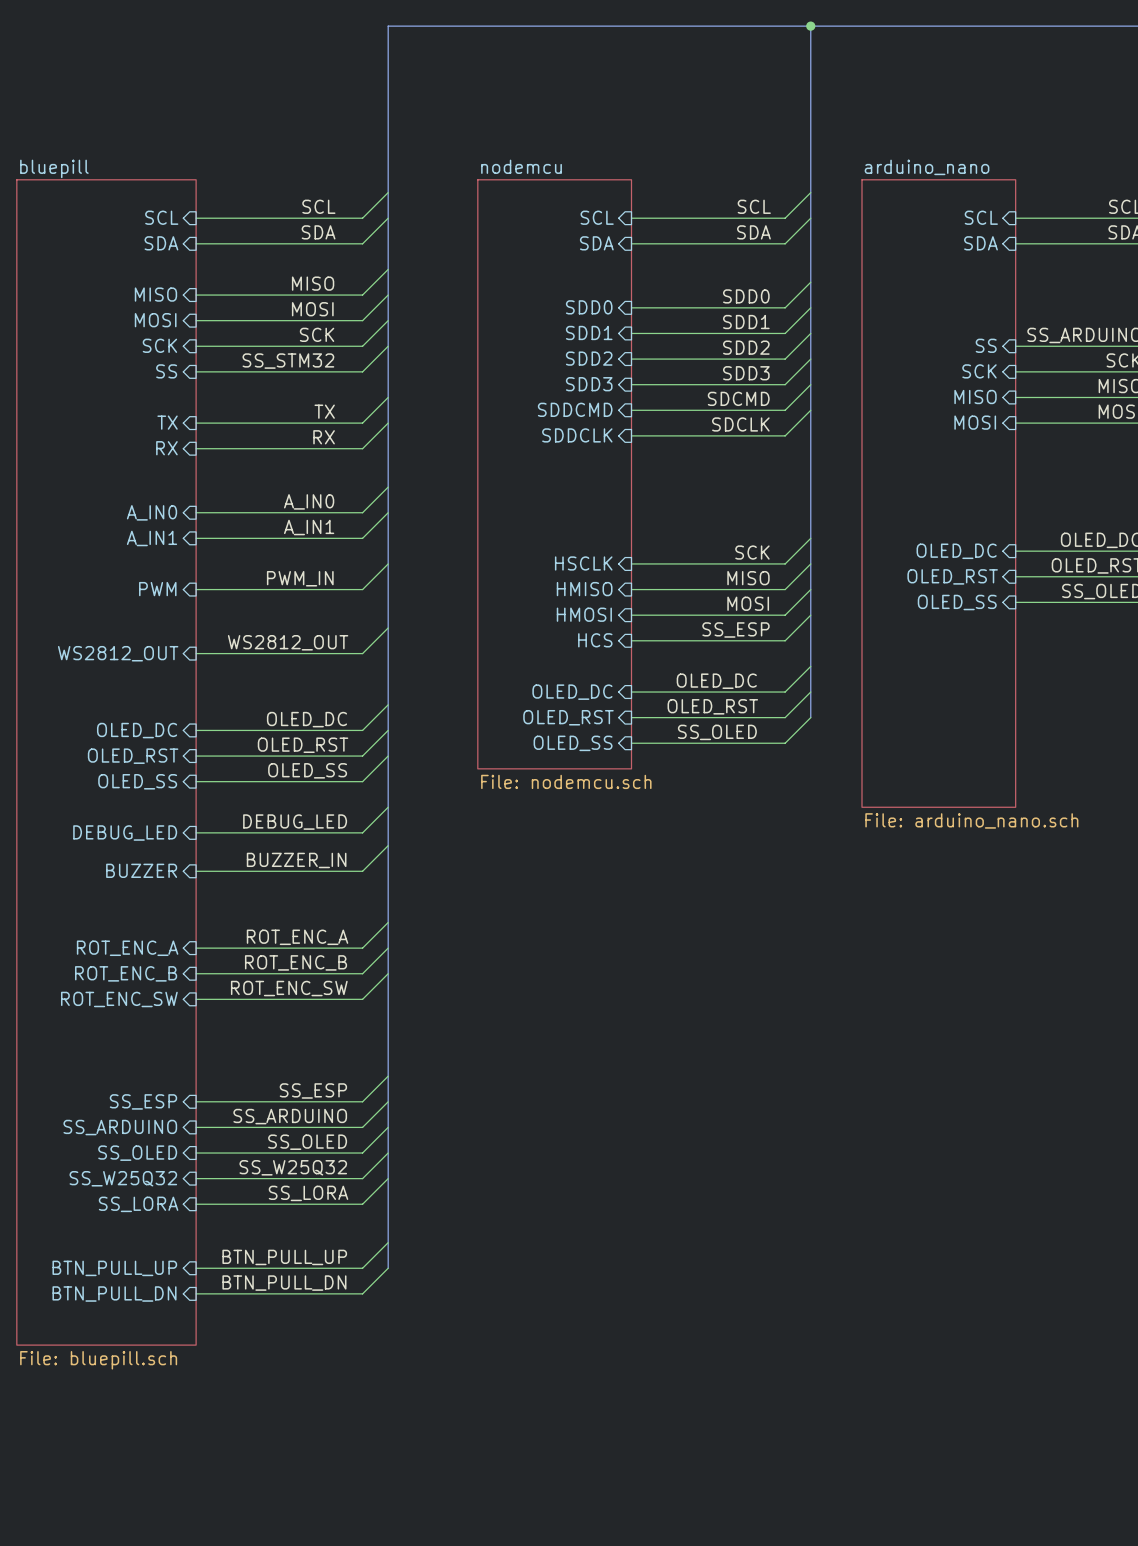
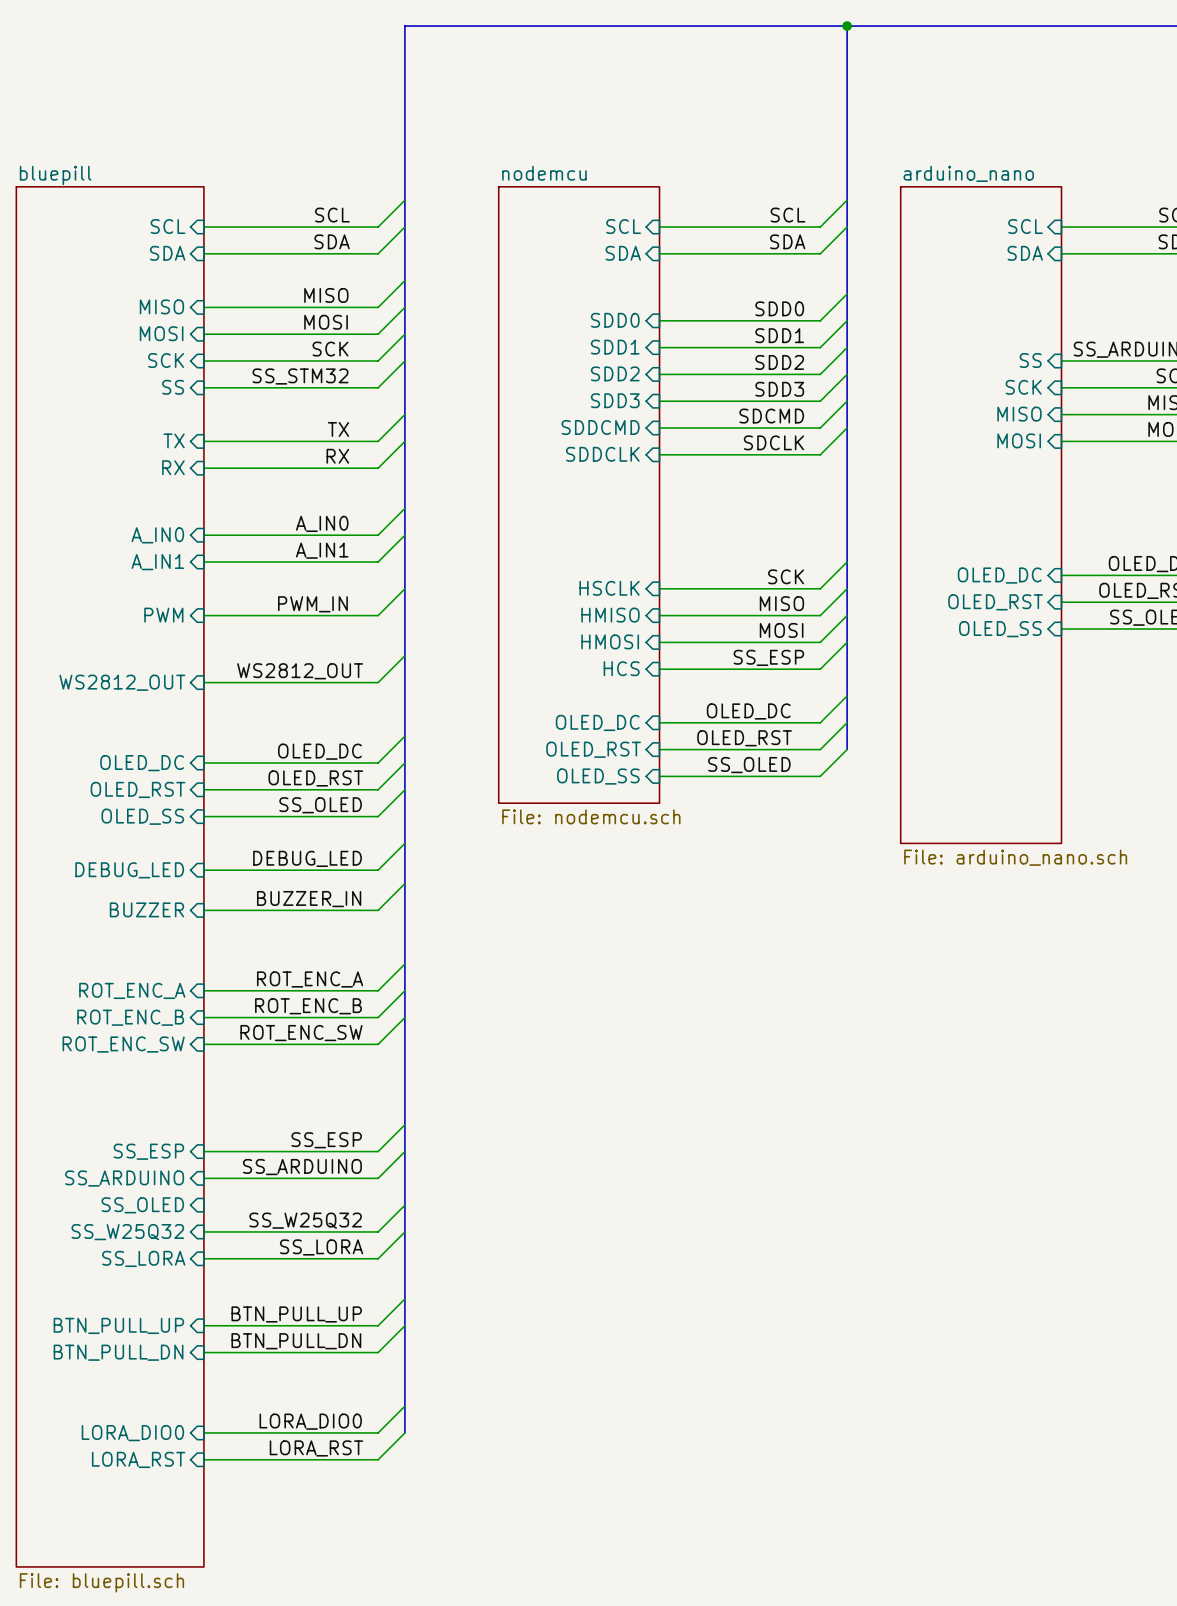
sheet bluepill: File: bluepill.sch (106, 762) -> none
label: OLED_SS (307, 770) -> SS_OLED (320, 805)
sheet bluepill: none -> File: bluepill.sch (110, 876)
wire: (388, 1127) (362, 1153) (196, 1153) -> (404, 1406) (378, 1432) (203, 1432)
label: SS_OLED (307, 1142) -> none
bus: none -> (404, 1325) (404, 1432)
label: none -> LORA_DIO0 (310, 1421)
sheet pin: none -> LORA_DIO0 (132, 1433)
wire: none -> (404, 1432) (378, 1459) (203, 1459)
label: none -> LORA_RST (316, 1448)
sheet pin: none -> LORA_RST (138, 1459)

